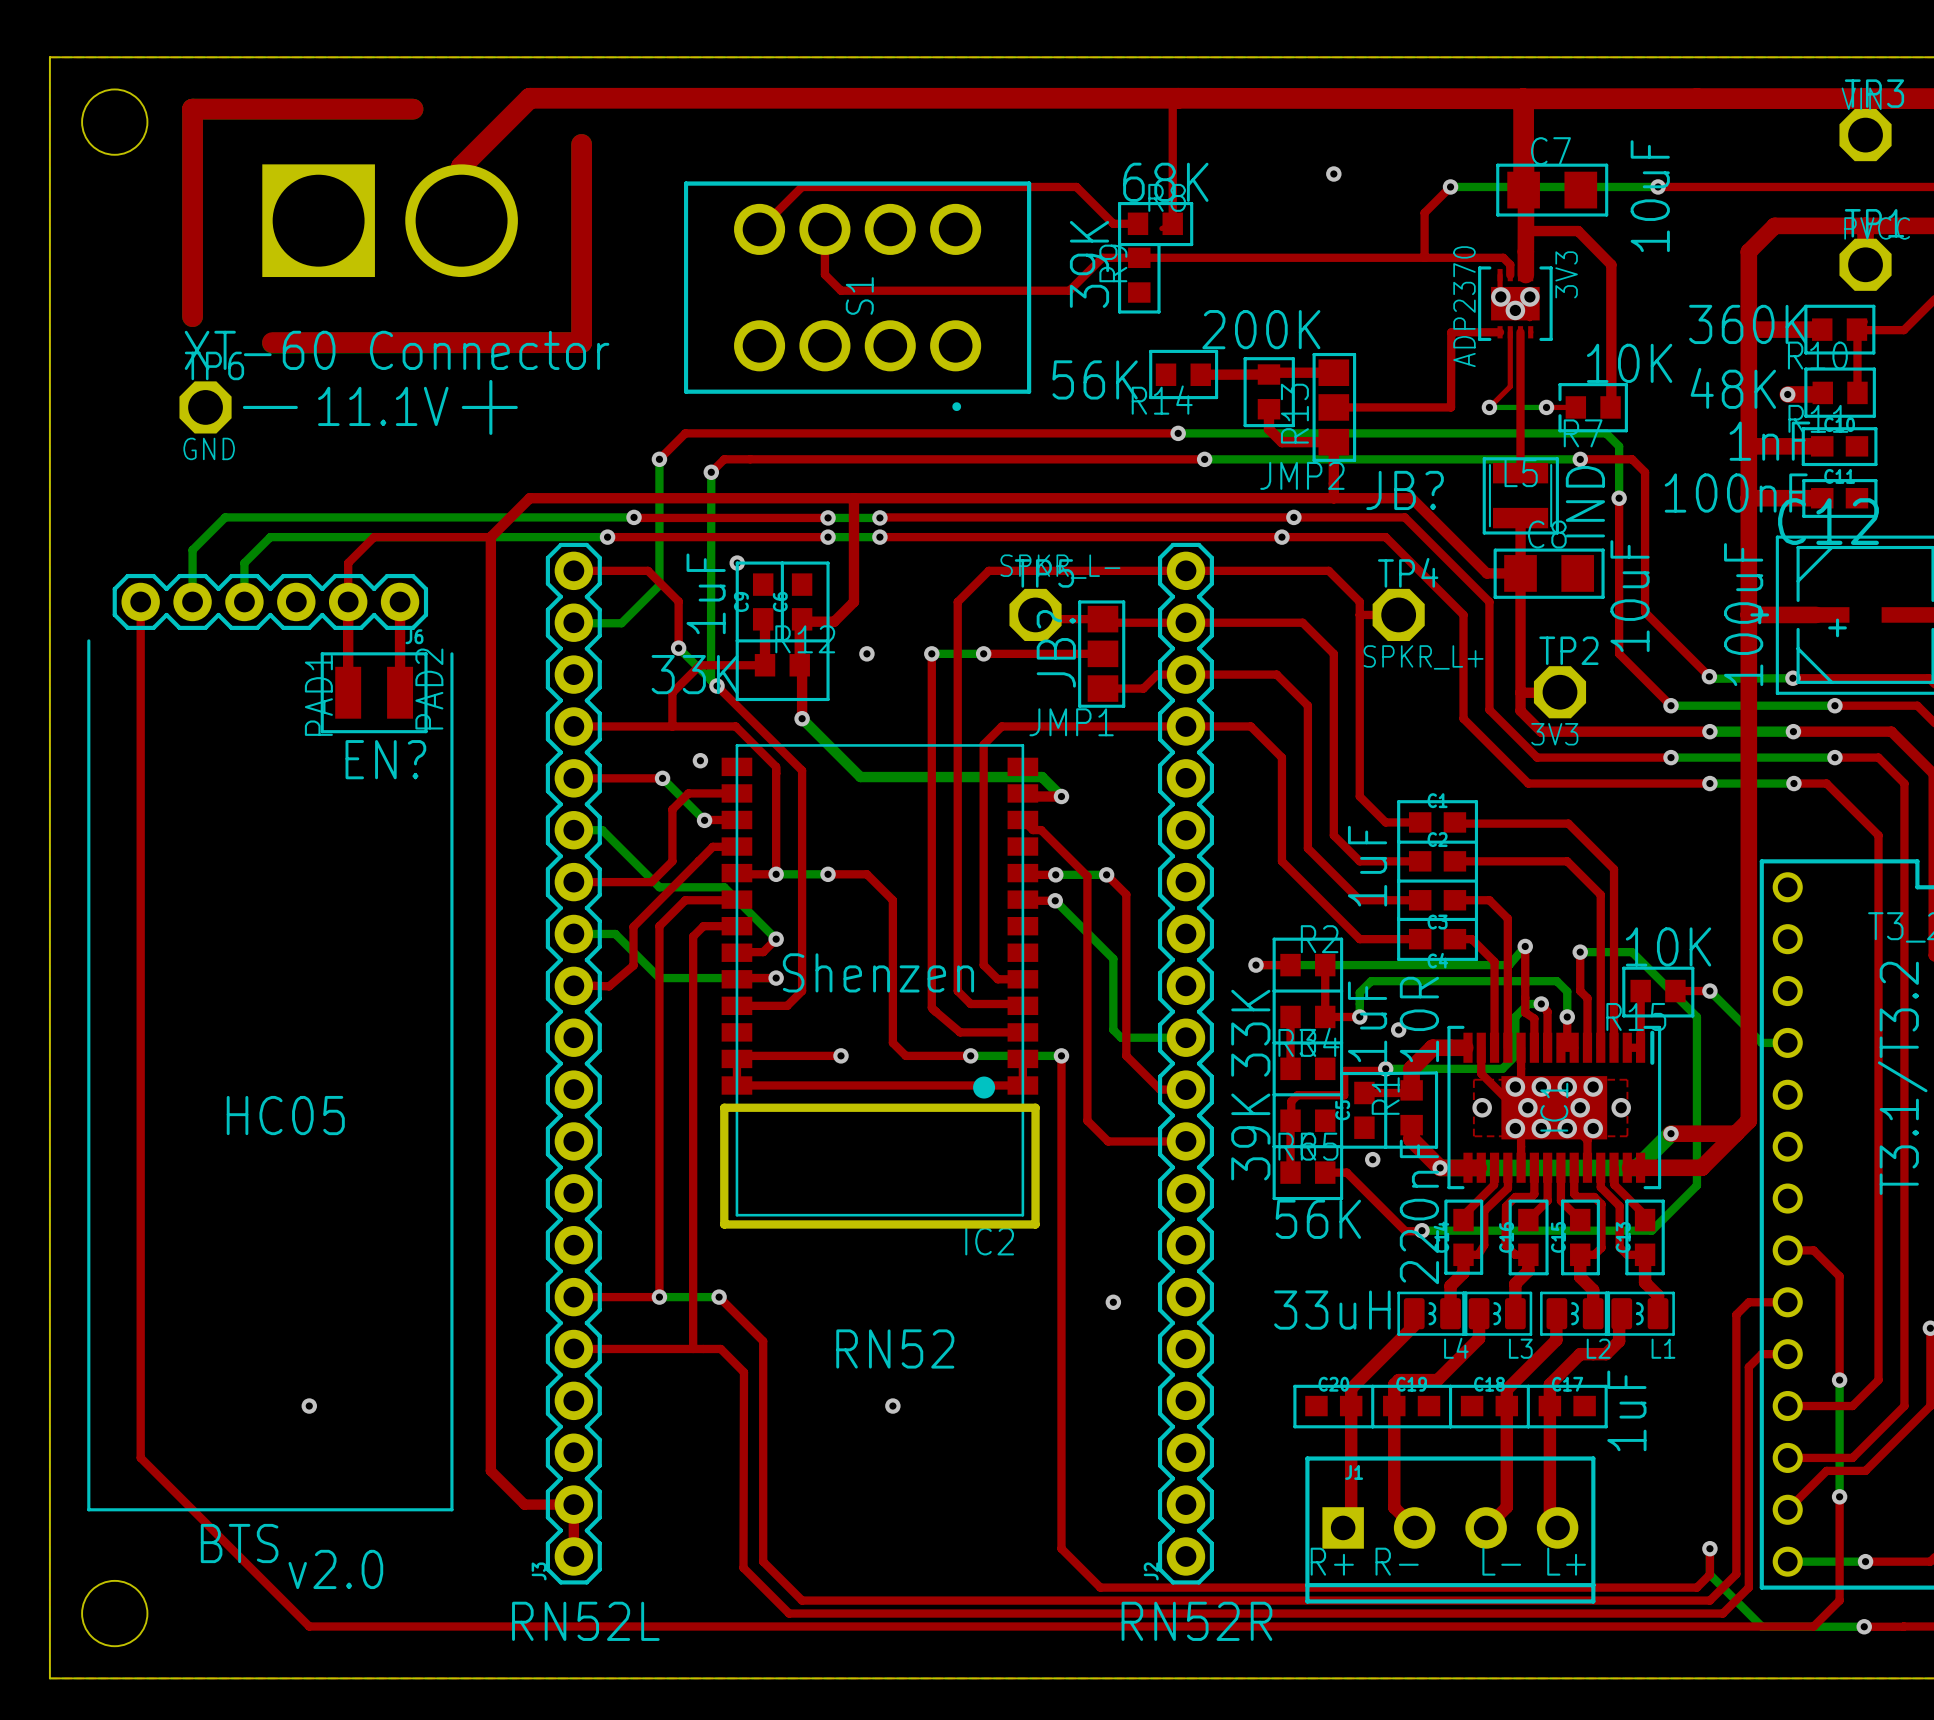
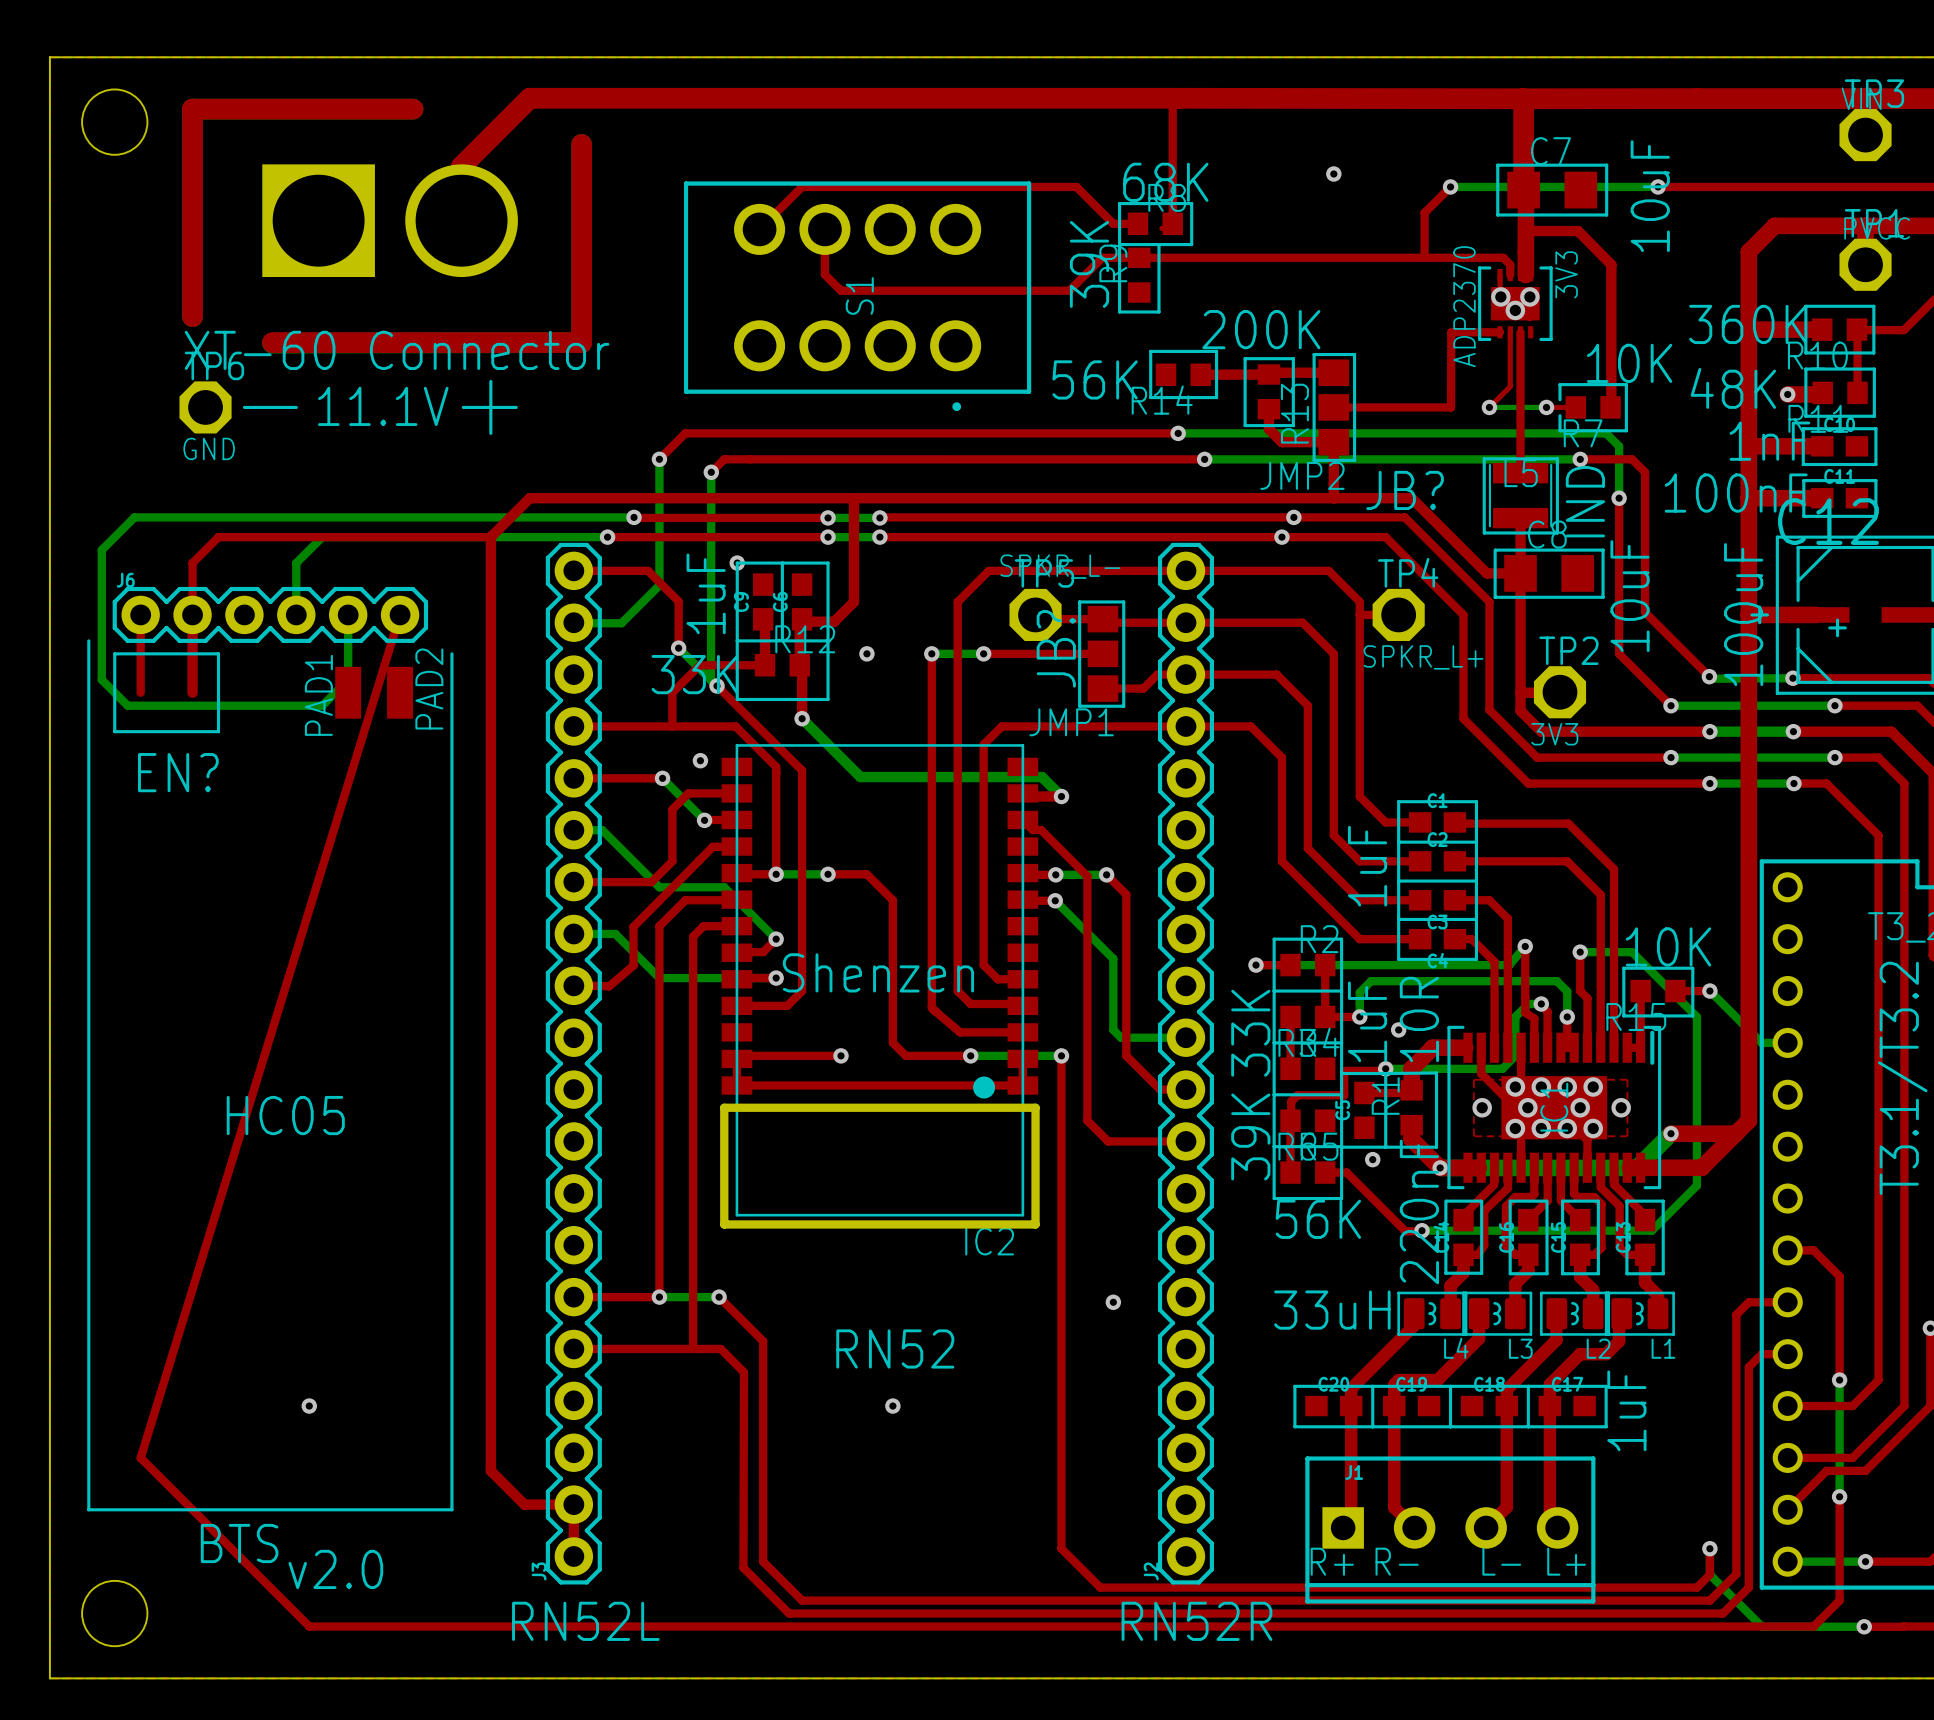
bottom track: (225, 517) (192, 550) (192, 601) -> (225, 517) (134, 517) (101, 550) (101, 679) (127, 705) (322, 705) (348, 679) (348, 614)
bottom track: (322, 537) (270, 537) (244, 563) (244, 601) -> (322, 537) (296, 563) (296, 614)
top track: (374, 537) (348, 563) (348, 692) -> (374, 537) (218, 537) (192, 563) (192, 692)
J6 position: (270, 601) -> (270, 614)
top track: (400, 601) (400, 692) -> none
J6 name position: J6 (414, 636) -> J6 (125, 580)
line: (322, 653) (426, 653) (426, 731) (322, 731) (322, 653) -> (114, 653) (218, 653) (218, 731) (114, 731) (114, 653)
top track: (140, 692) (140, 1457) -> (400, 614) (140, 1457)
text position: EN? (385, 759) -> EN? (178, 772)

